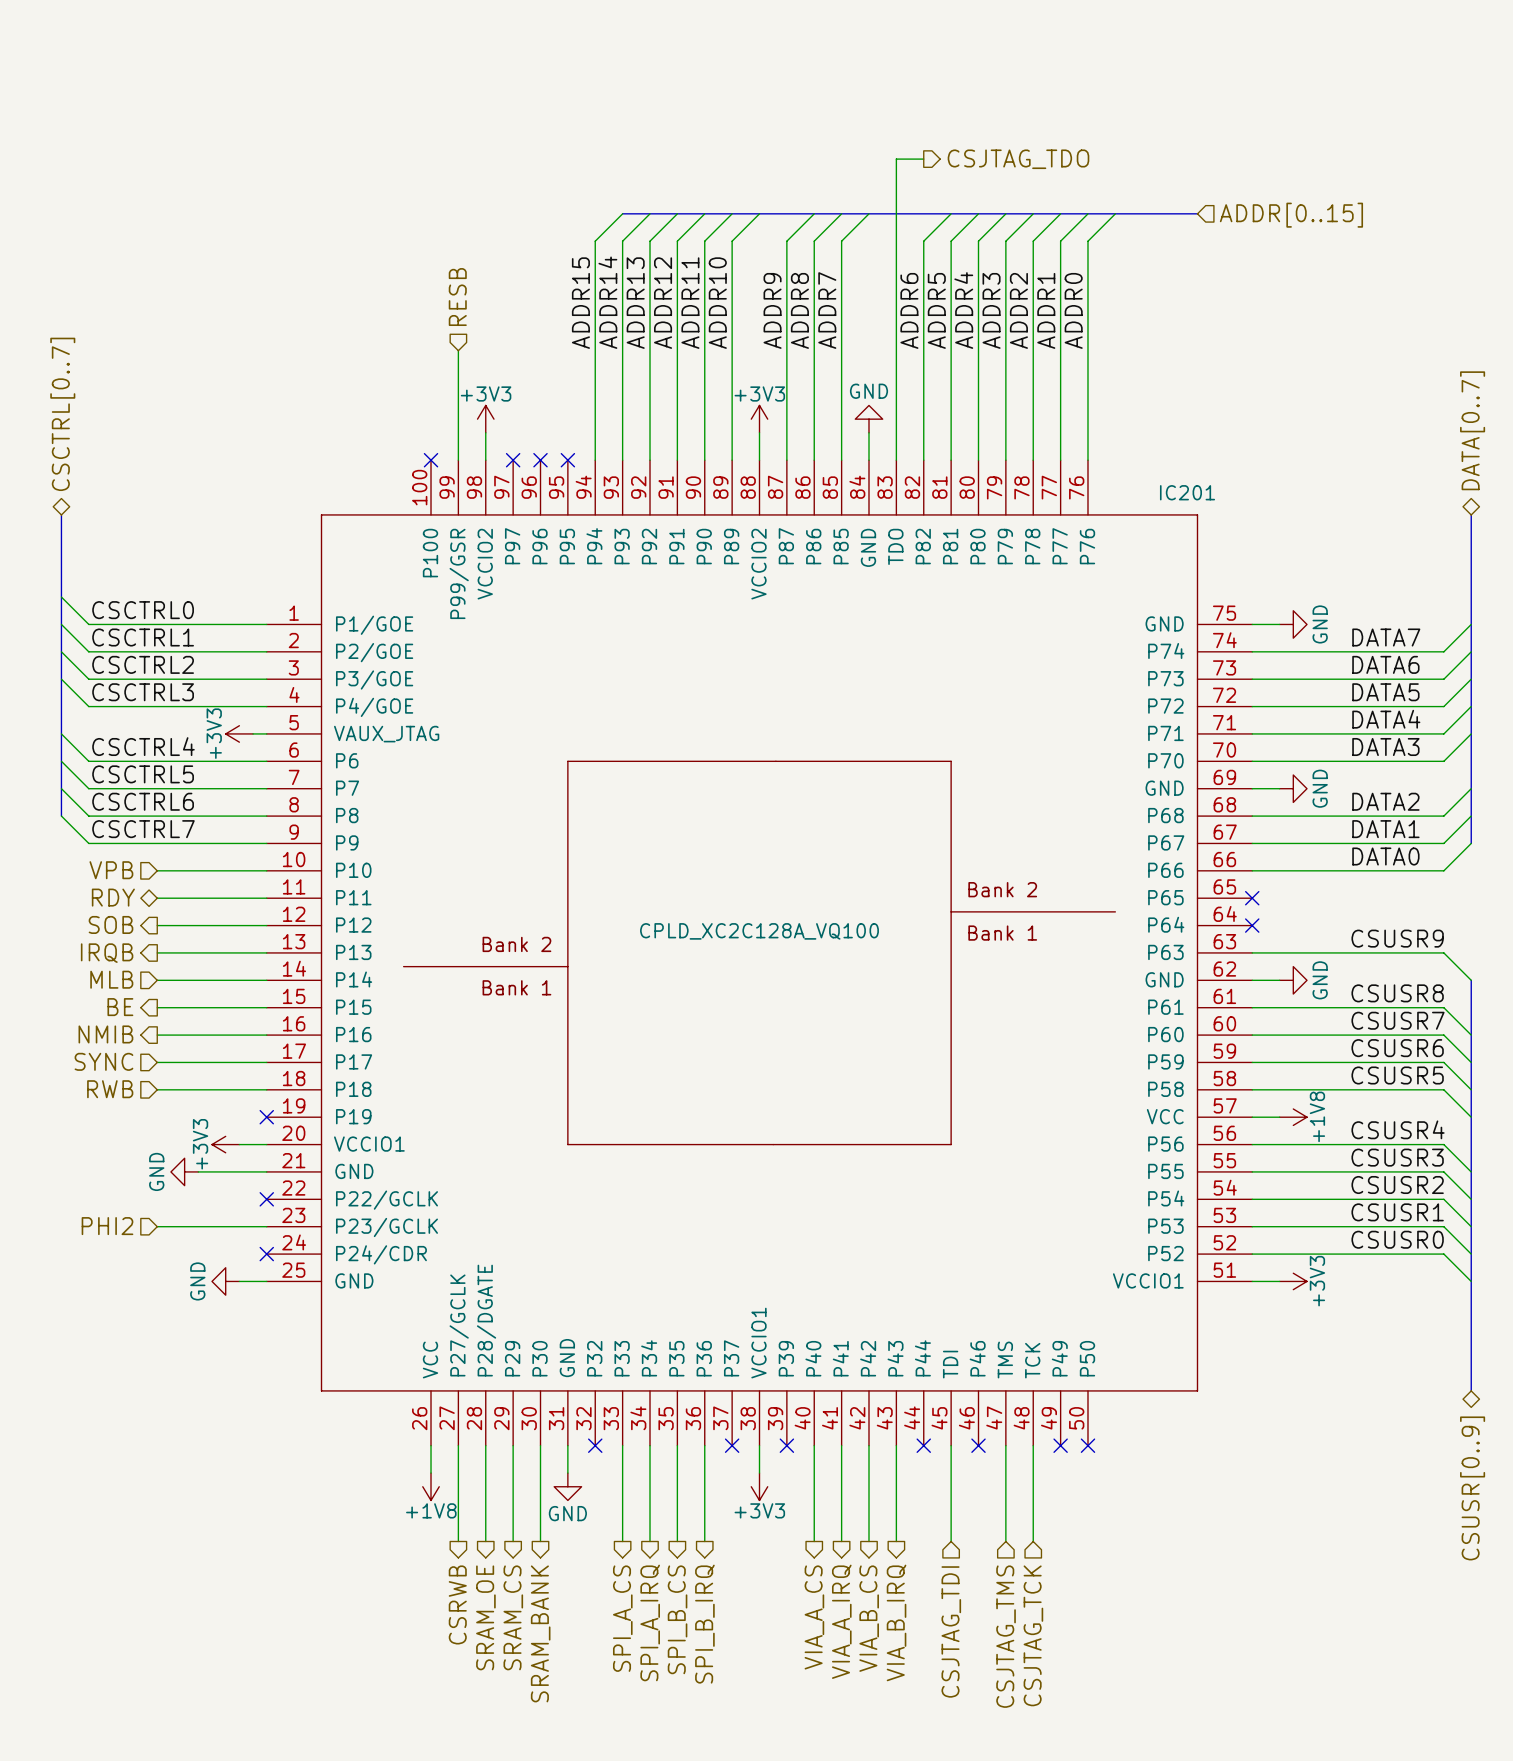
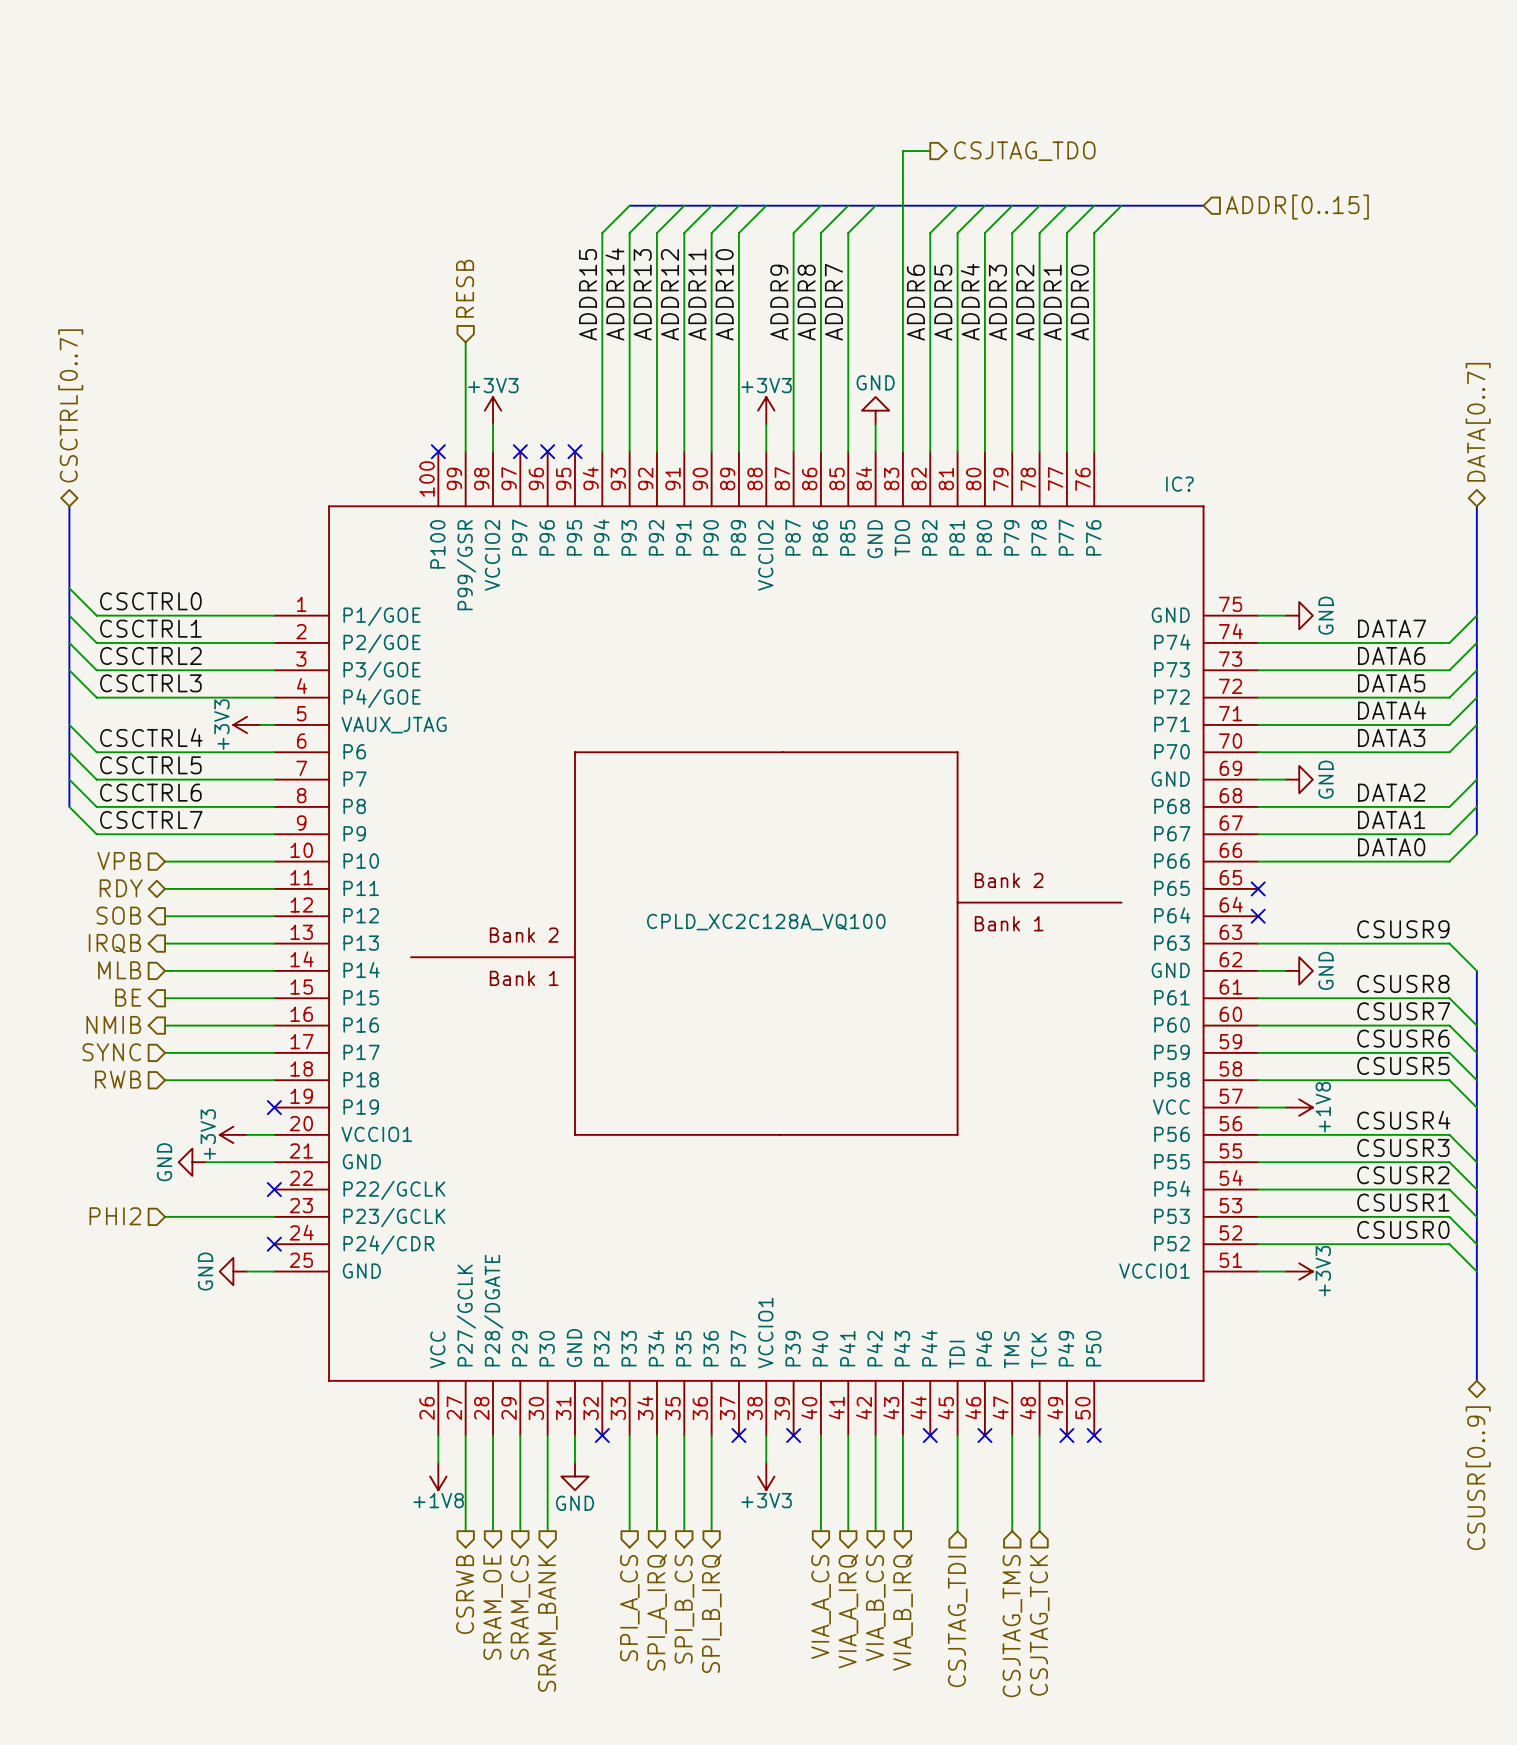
IC201 name: IC201 (1187, 492) -> IC? (1179, 484)

